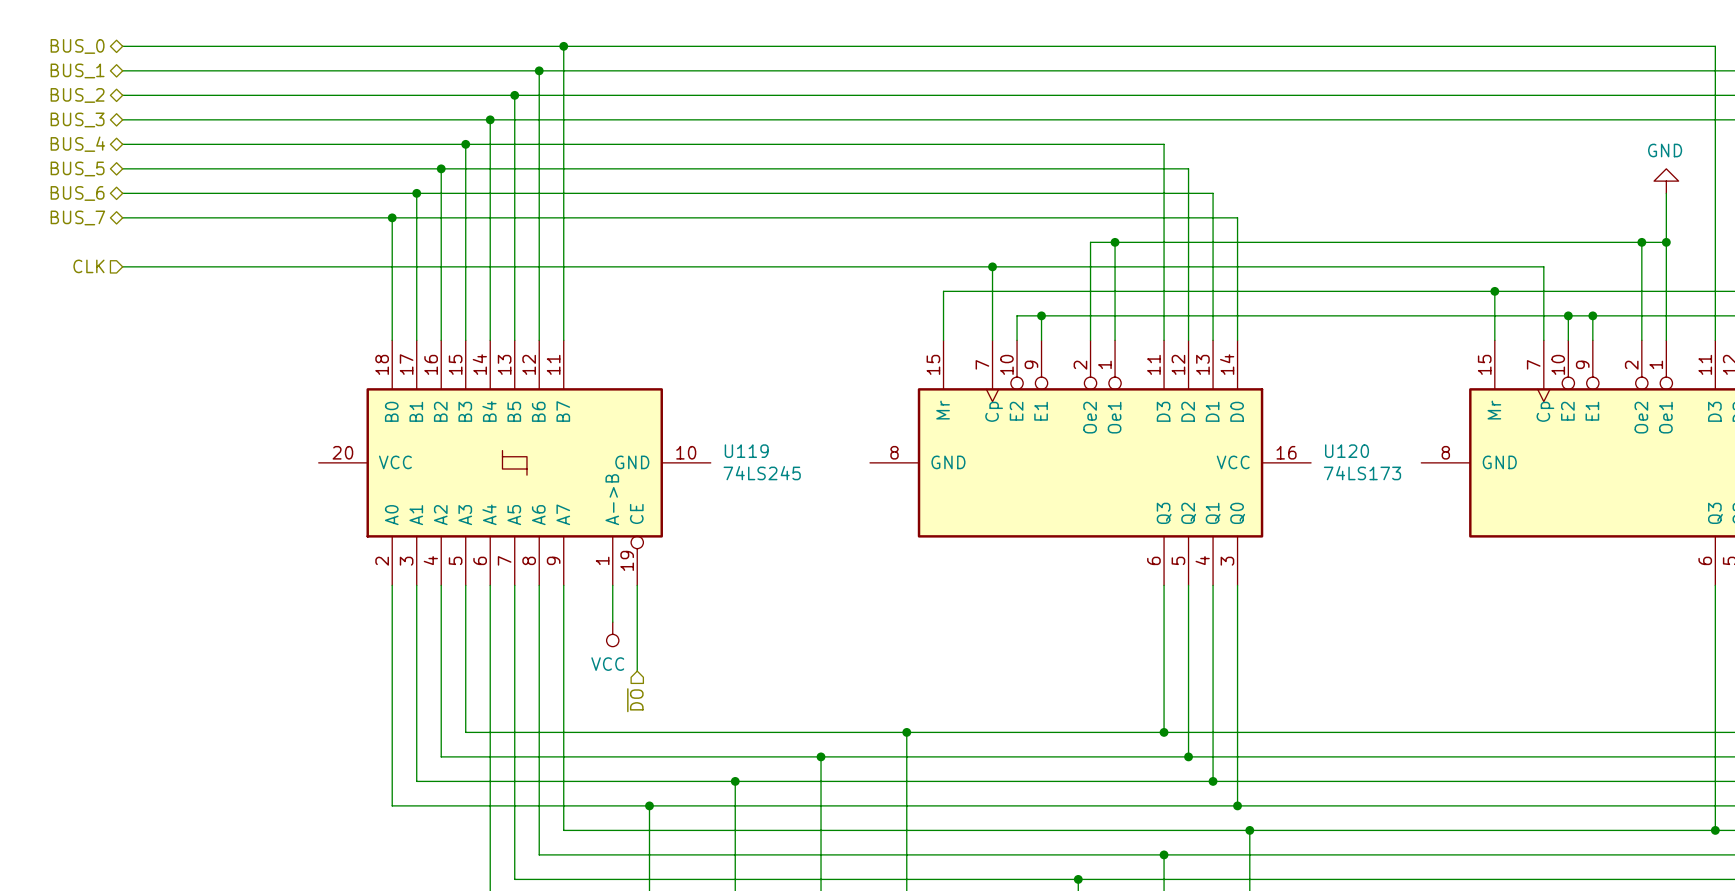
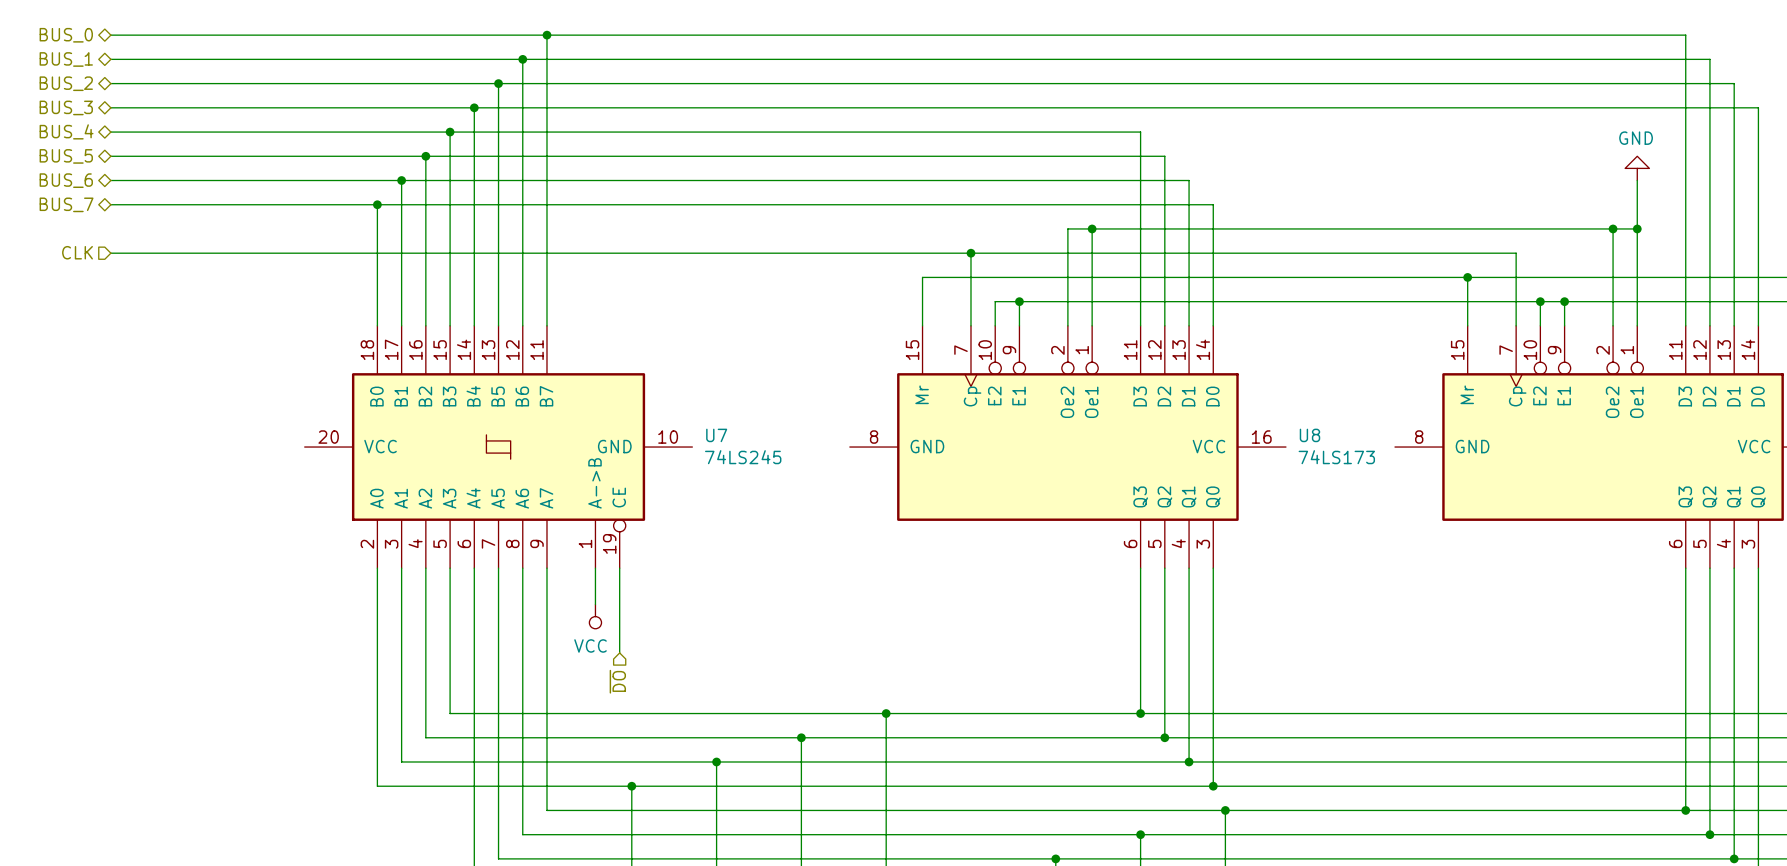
U119 name: U119 (746, 451) -> U7 (716, 435)
U120 name: U120 (1347, 451) -> U8 (1309, 435)

